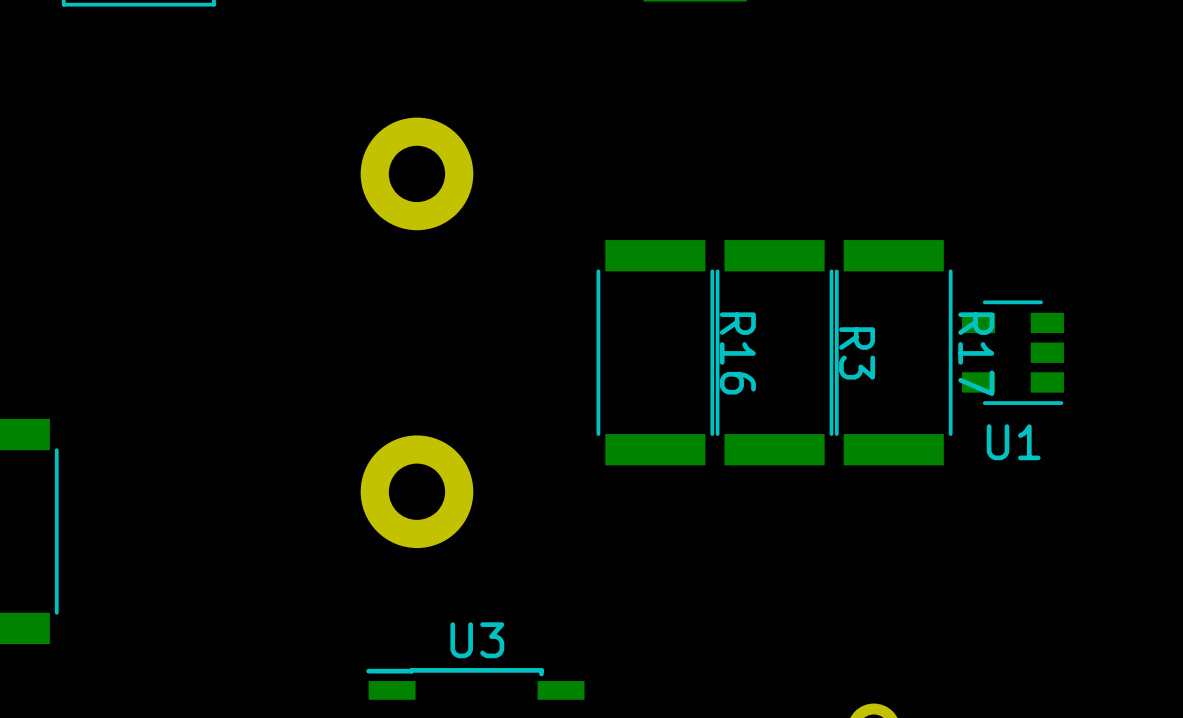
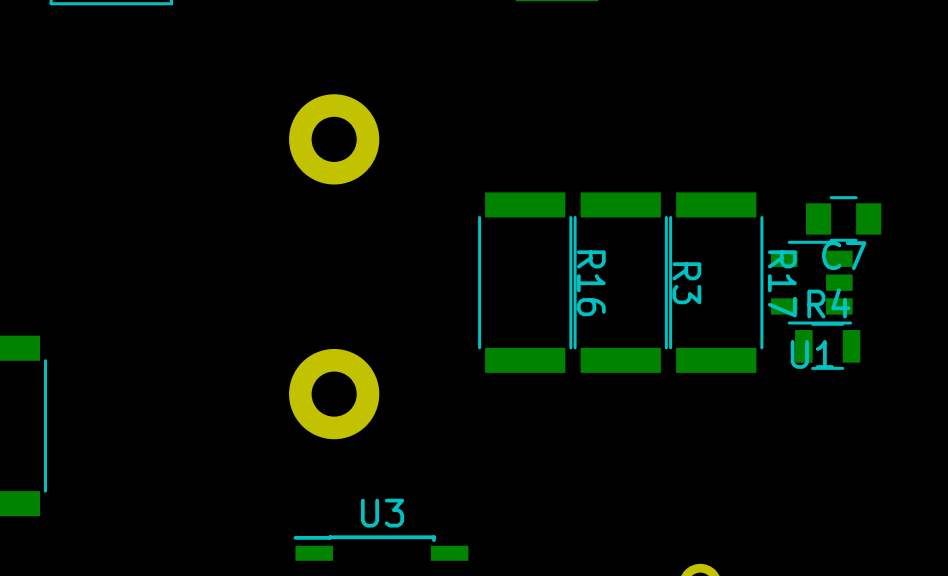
C7: none -> (843, 218)
R4: none -> (827, 346)

